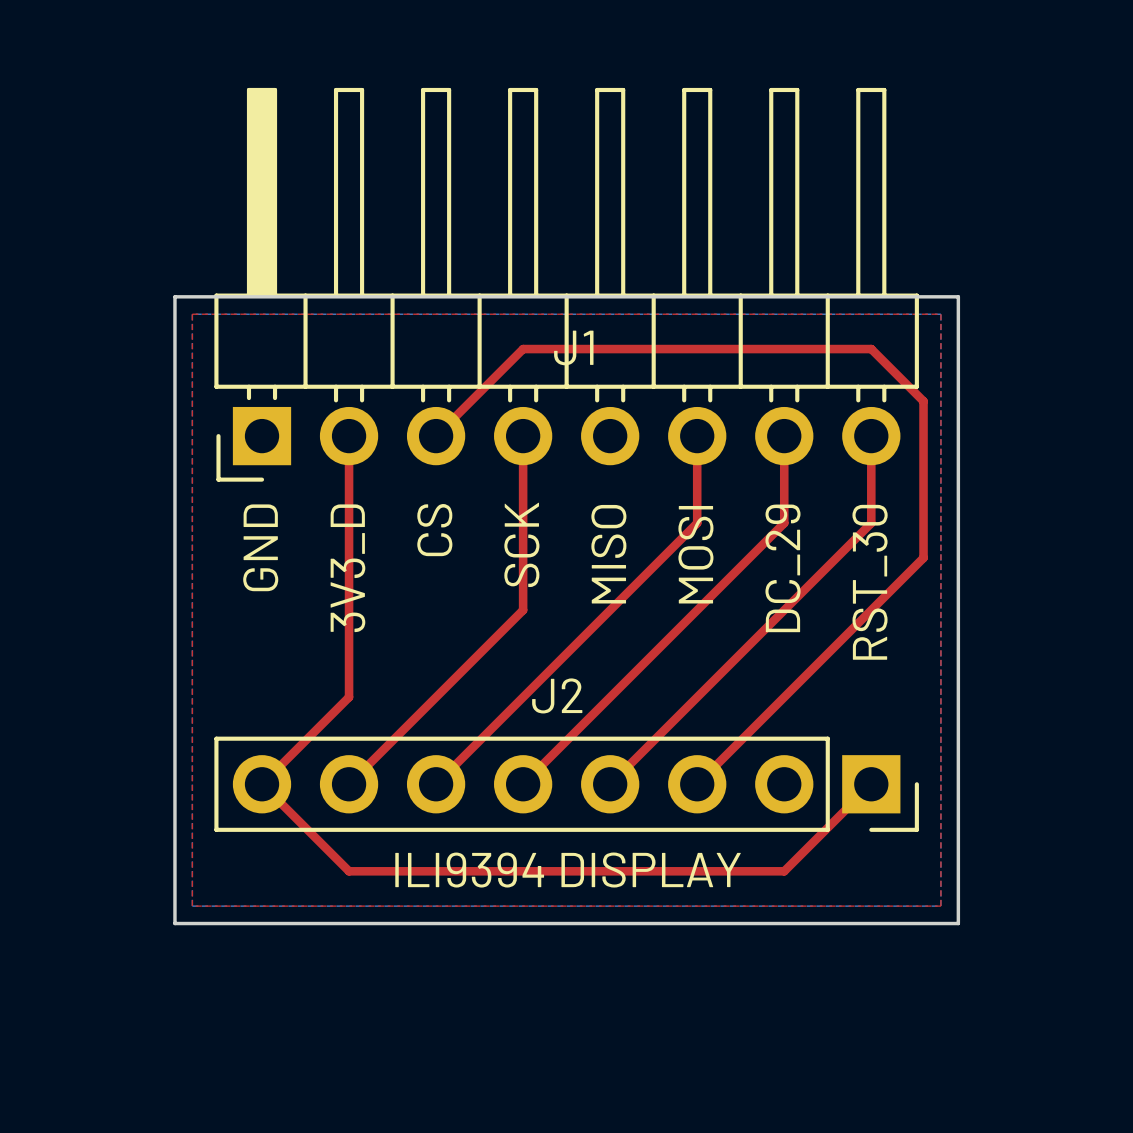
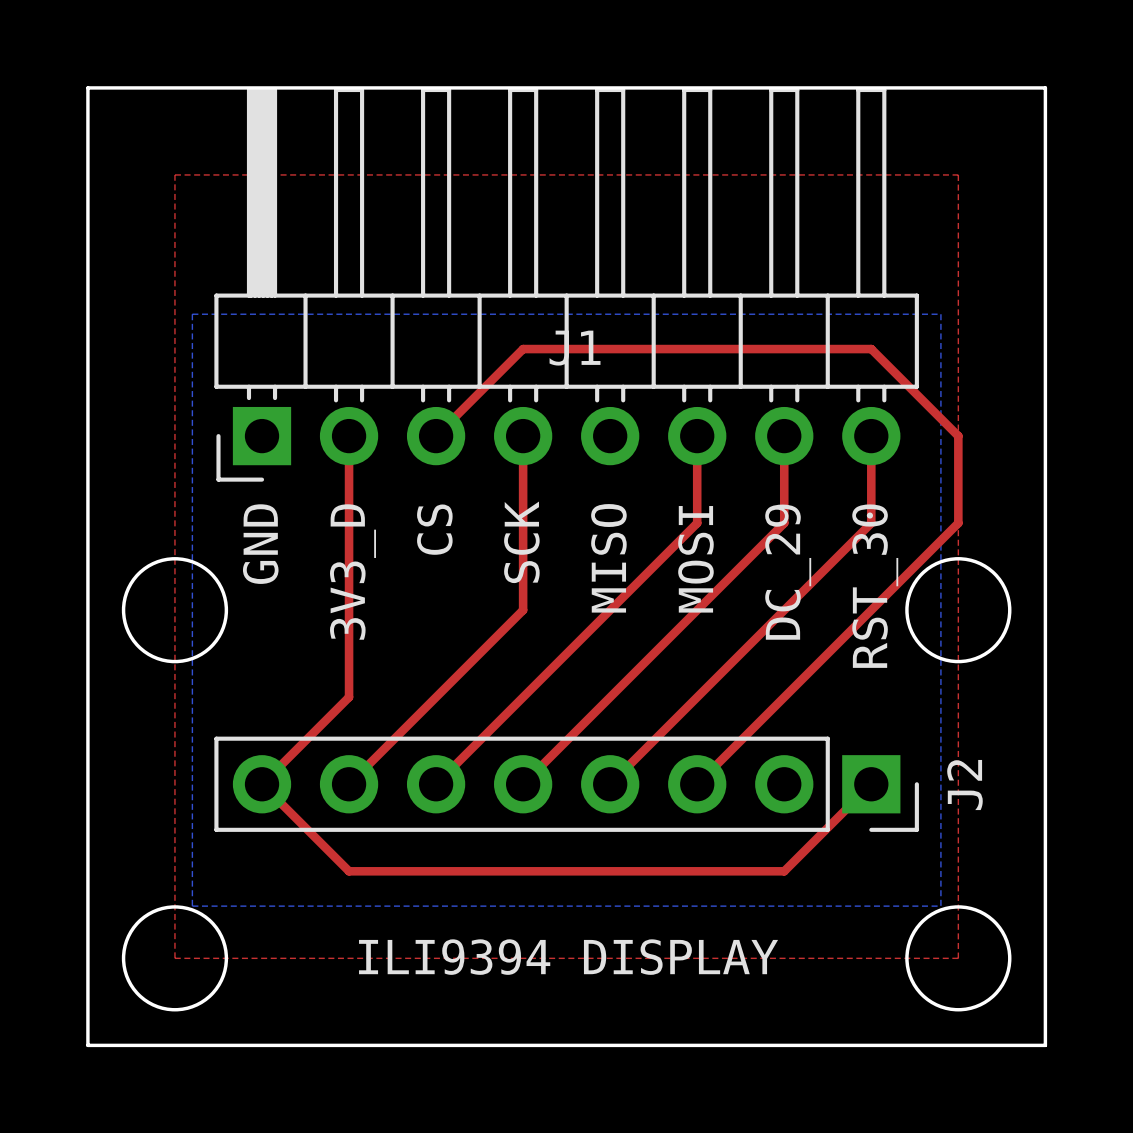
board edge: (174, 296) (958, 296) (958, 923) (174, 923) (174, 296) -> (87, 87) (87, 1045) (1045, 1045) (1045, 87) (87, 87)
top zone outline: (192, 314) (192, 906) (940, 906) (940, 314) (192, 314) -> (174, 174) (174, 958) (958, 958) (958, 174) (174, 174)
top track: (923, 401) (923, 557) -> (923, 401) (958, 436) (958, 523) (923, 557)
round board edge: none -> [121, 557, 229, 664]
round board edge: none -> [905, 557, 1012, 664]
J2 name rotation: 0° (557, 695) -> 90° counterclockwise (964, 785)
J2 name position: J2 (557, 695) -> J2 (964, 785)
text position: ILI9394 DISPLAY (568, 870) -> ILI9394 DISPLAY (568, 957)
round board edge: none -> [121, 905, 229, 1012]
round board edge: none -> [905, 905, 1012, 1012]

